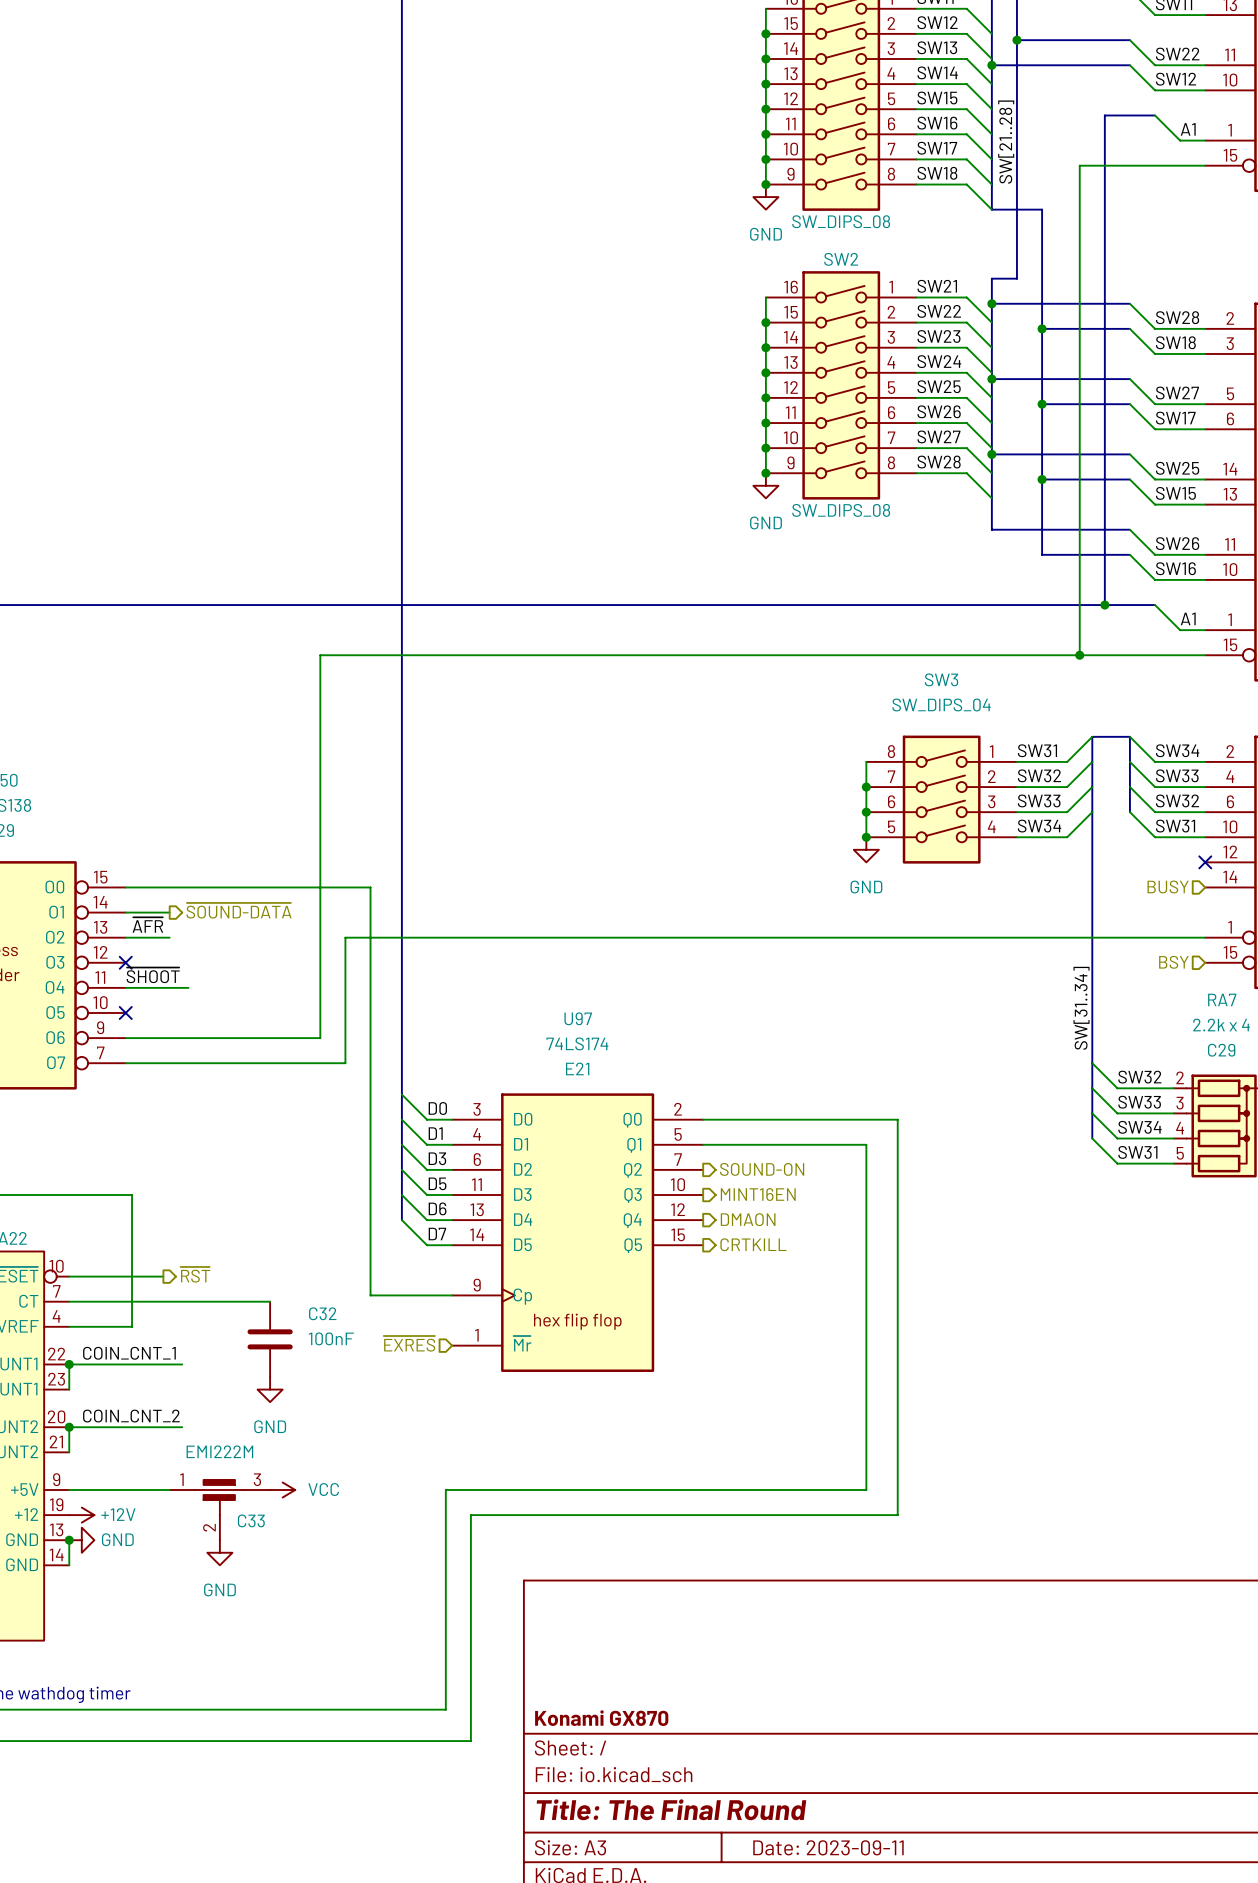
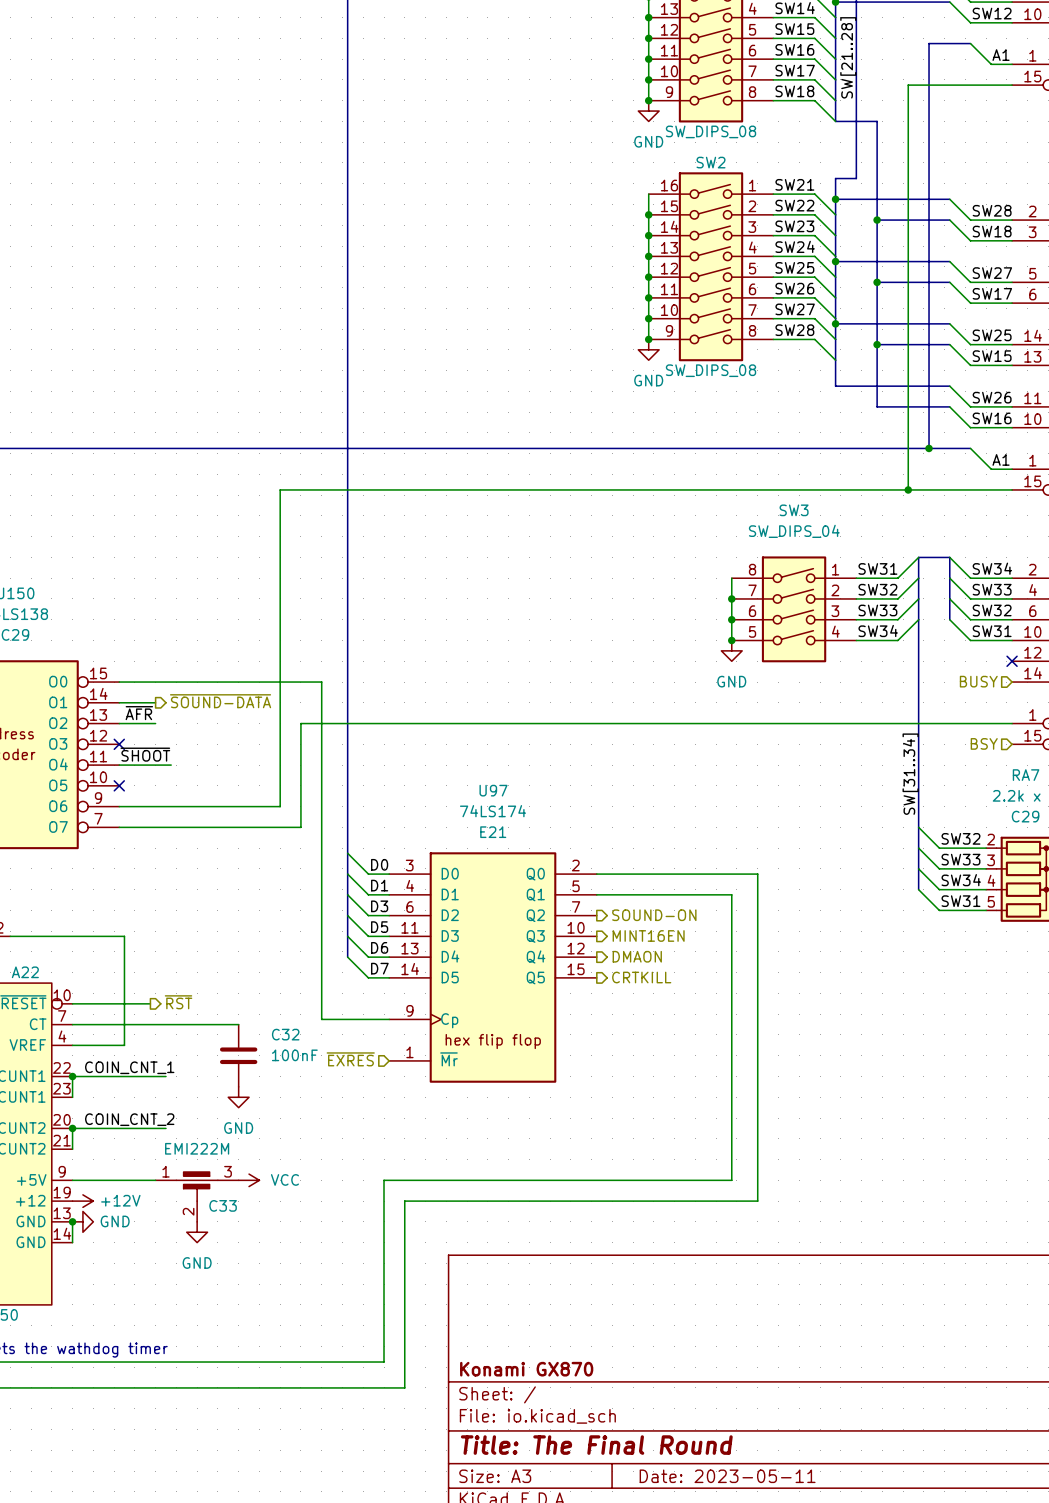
title block: Date: 2023-09-11 (828, 1847) -> Date: 2023-05-11 (727, 1476)

